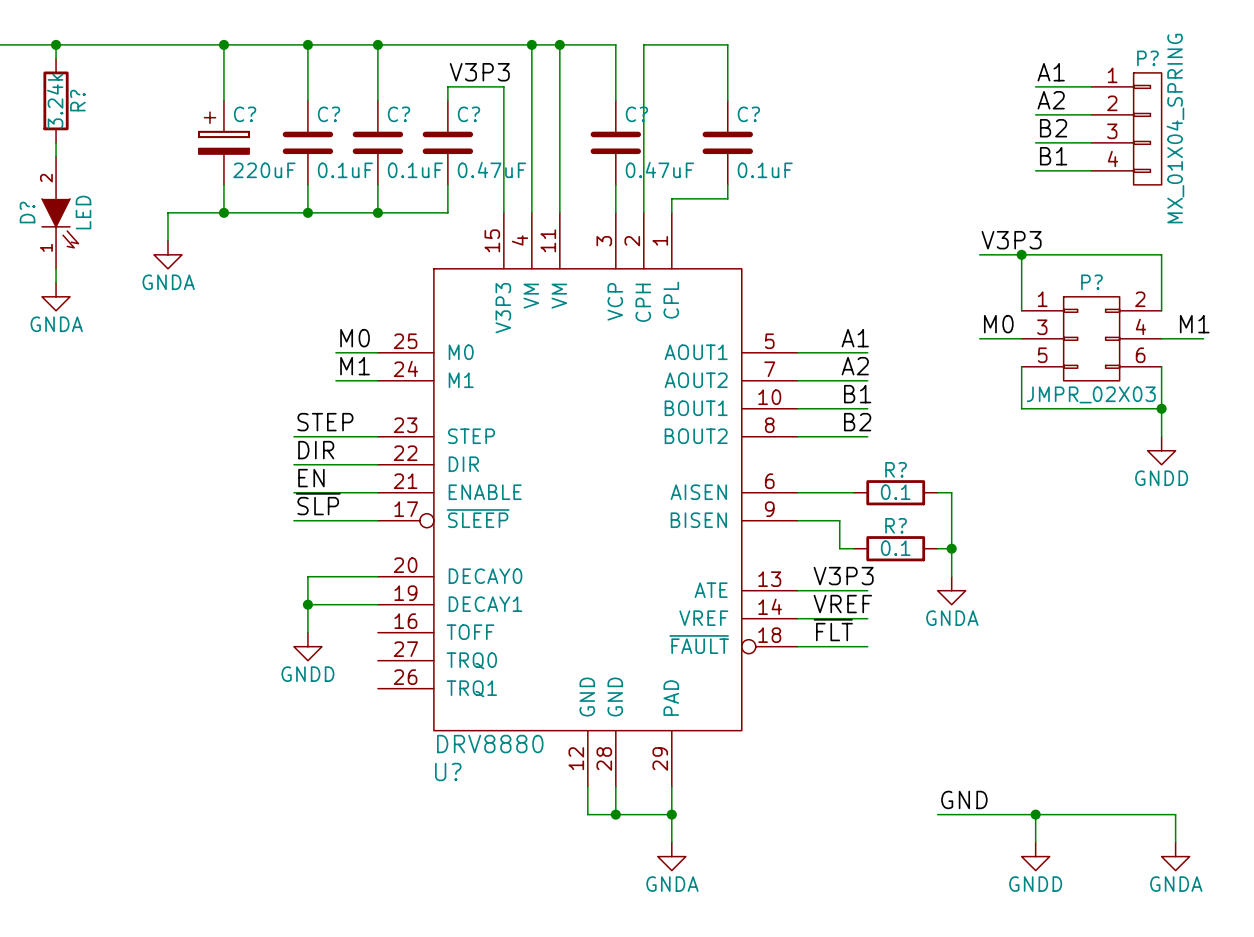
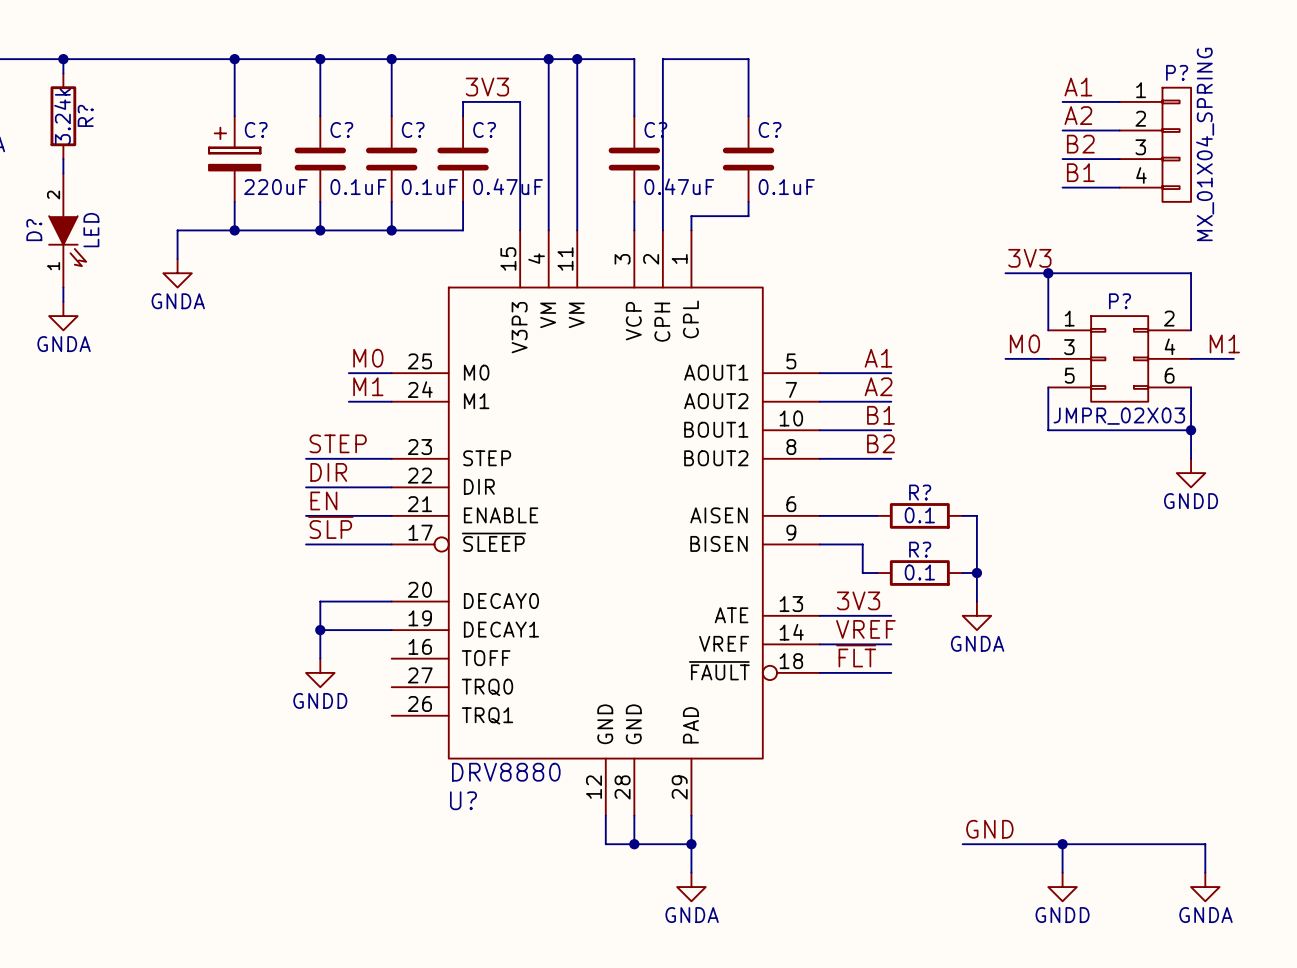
label: V3P3 (479, 72) -> 3V3 (487, 87)
label: V3P3 (1011, 240) -> 3V3 (1029, 258)
label: V3P3 (843, 576) -> 3V3 (858, 600)

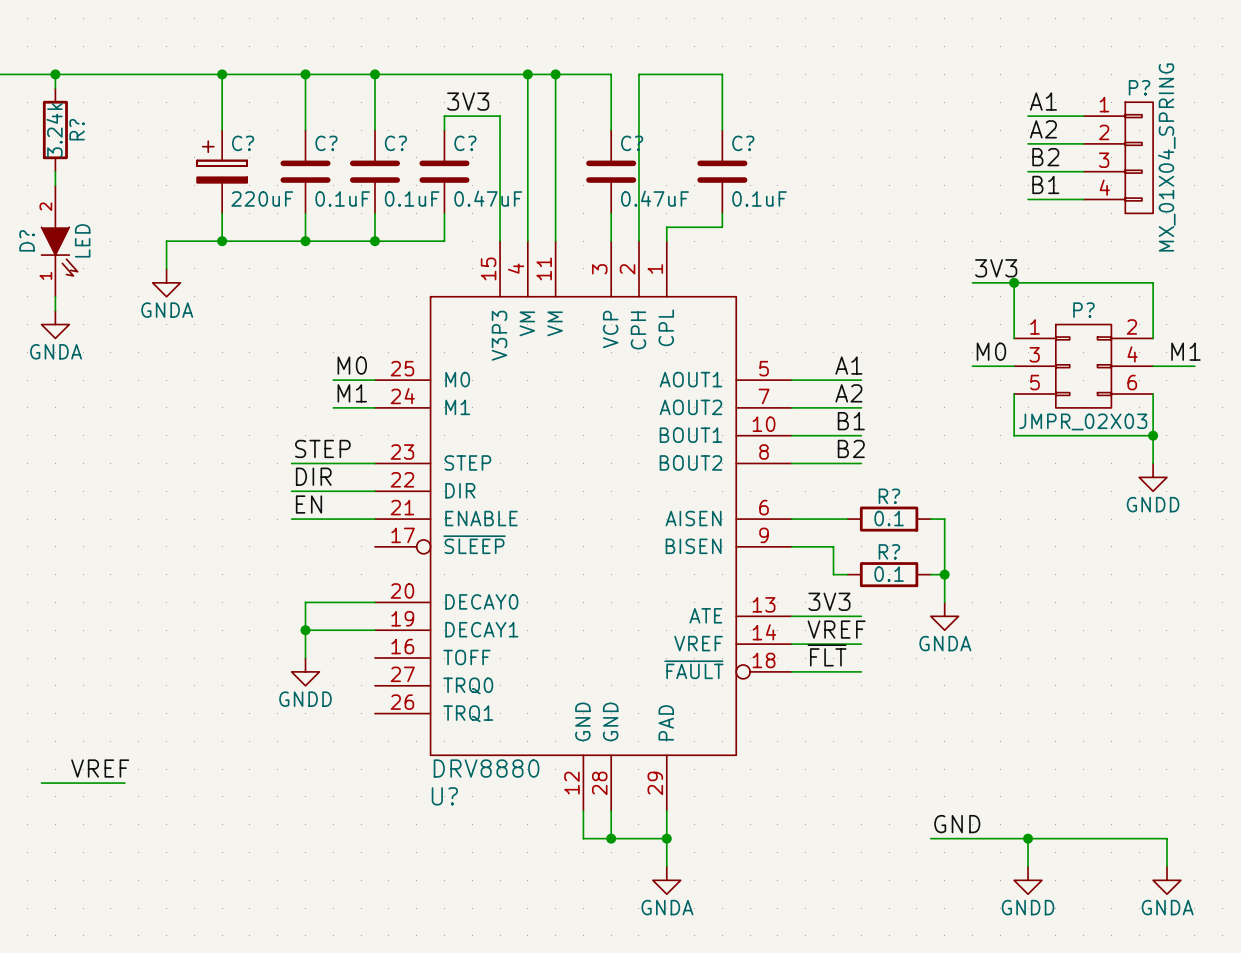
label: ~{SLP} (330, 527) -> none
wire: (306, 544) (391, 544) -> none
label: none -> VREF (100, 768)
wire: none -> (41, 783) (124, 783)

